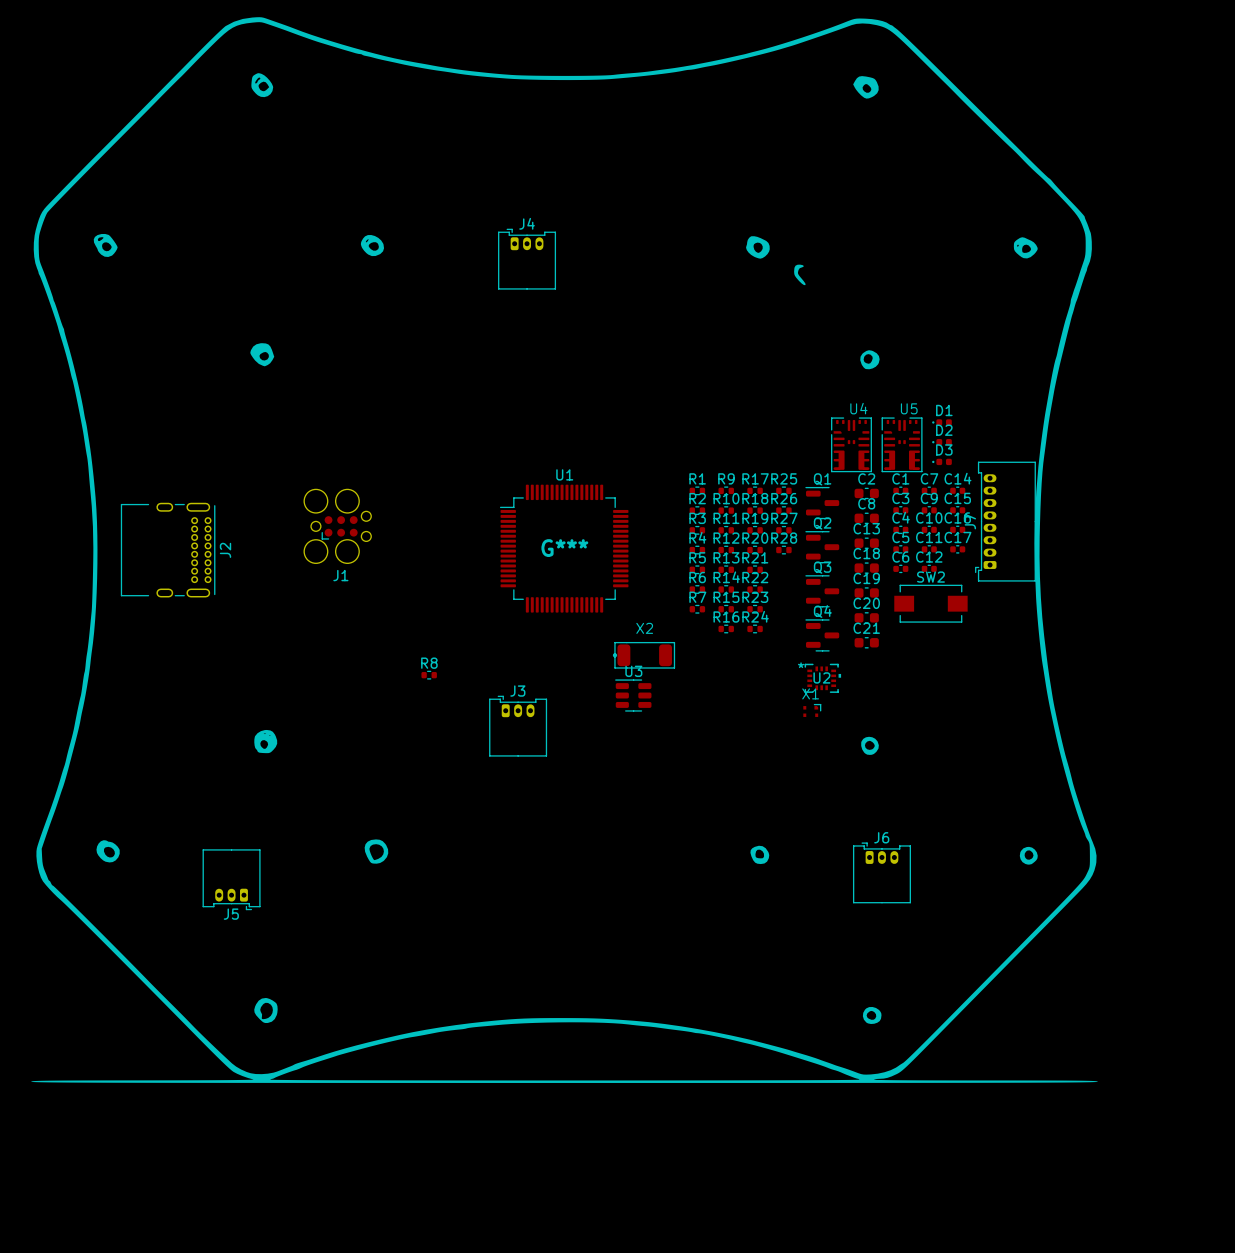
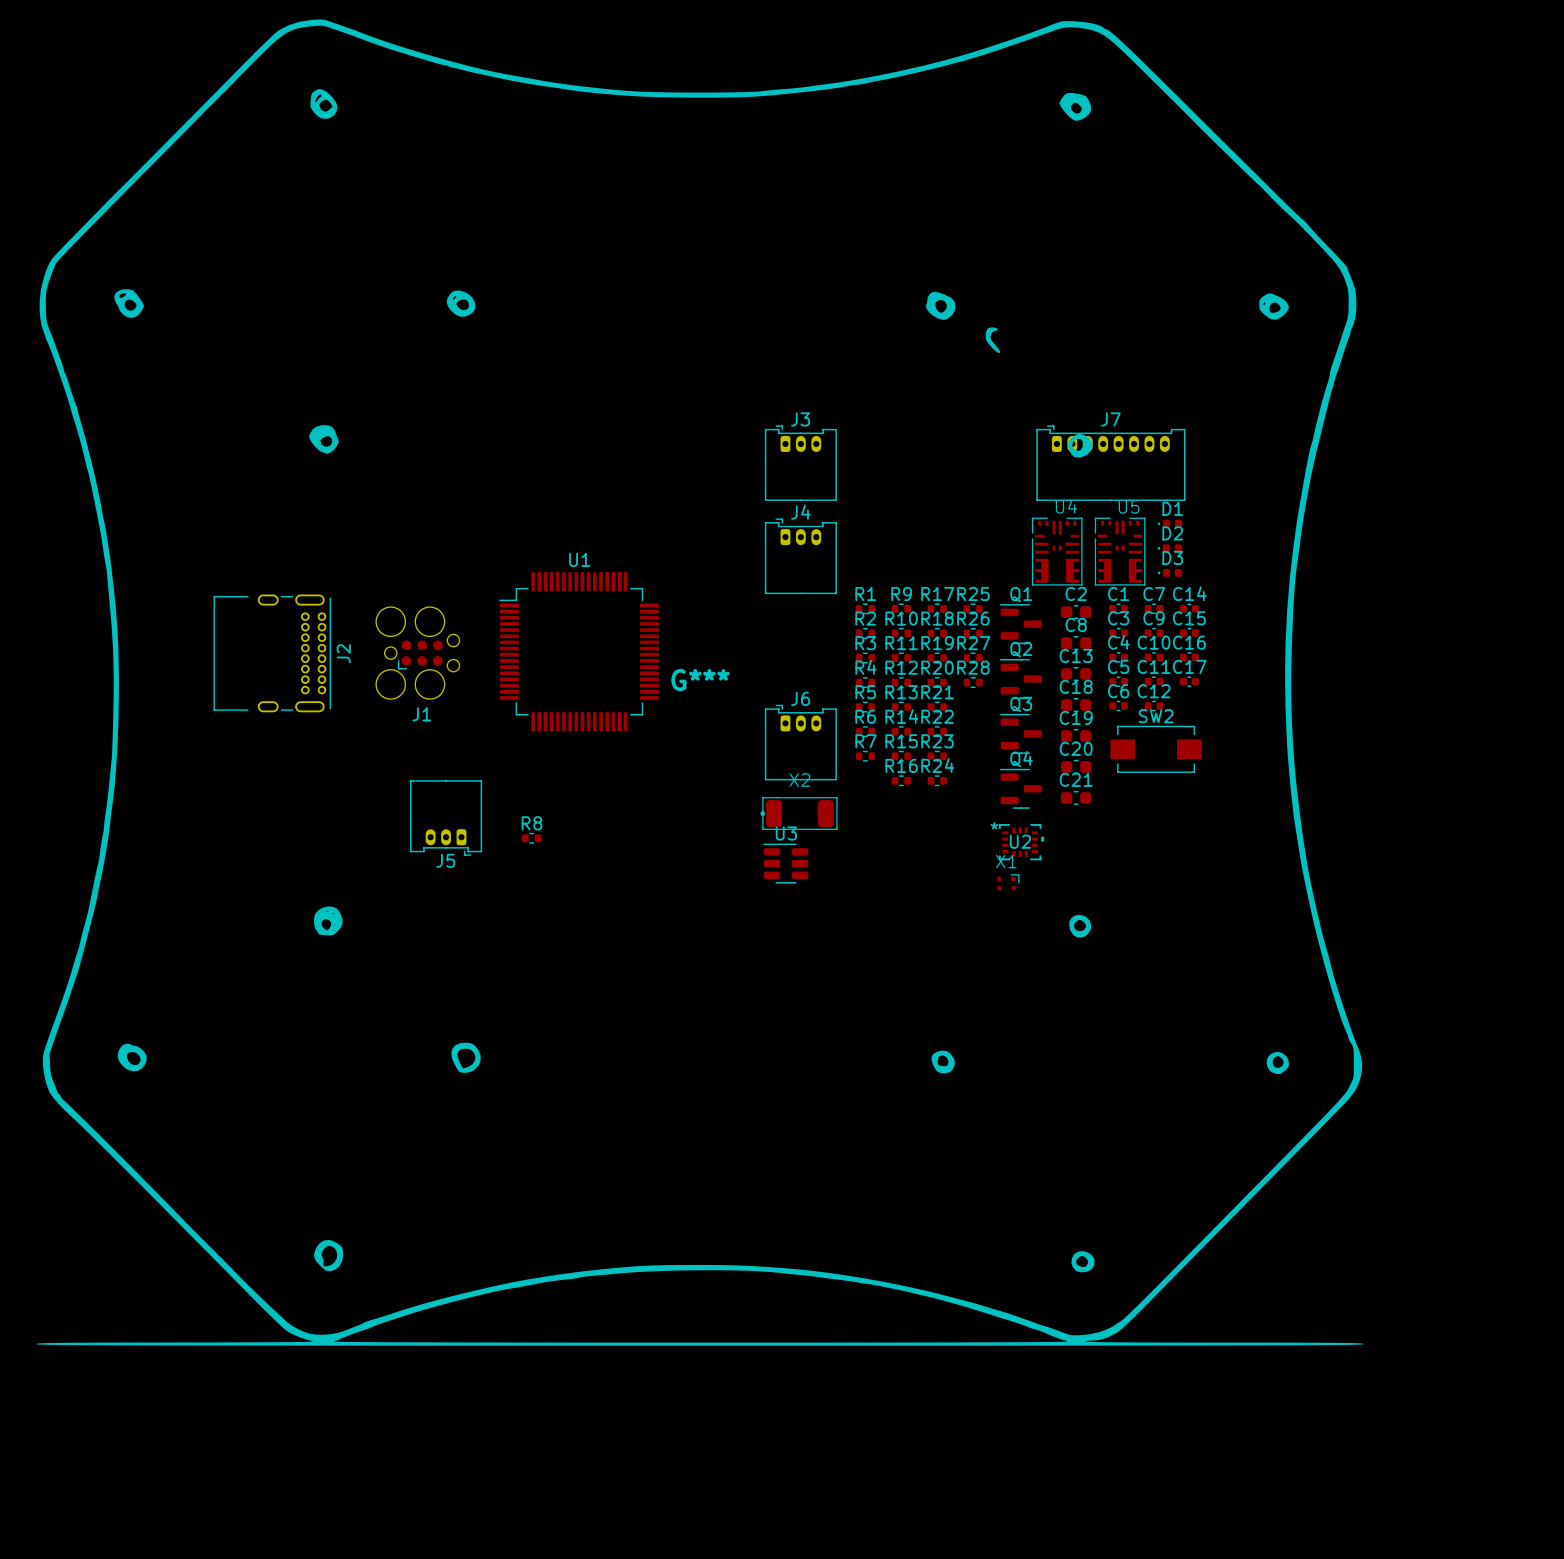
J4 position: (527, 259) -> (800, 556)
J7 rotation: 0° (1005, 521) -> 90° clockwise (1110, 463)
J7 position: (1005, 521) -> (1110, 463)
U1 position: (564, 548) -> (579, 651)
J2 position: (168, 550) -> (272, 653)
J3 position: (518, 726) -> (800, 463)
J6 position: (881, 872) -> (800, 742)
J5 position: (231, 879) -> (446, 818)

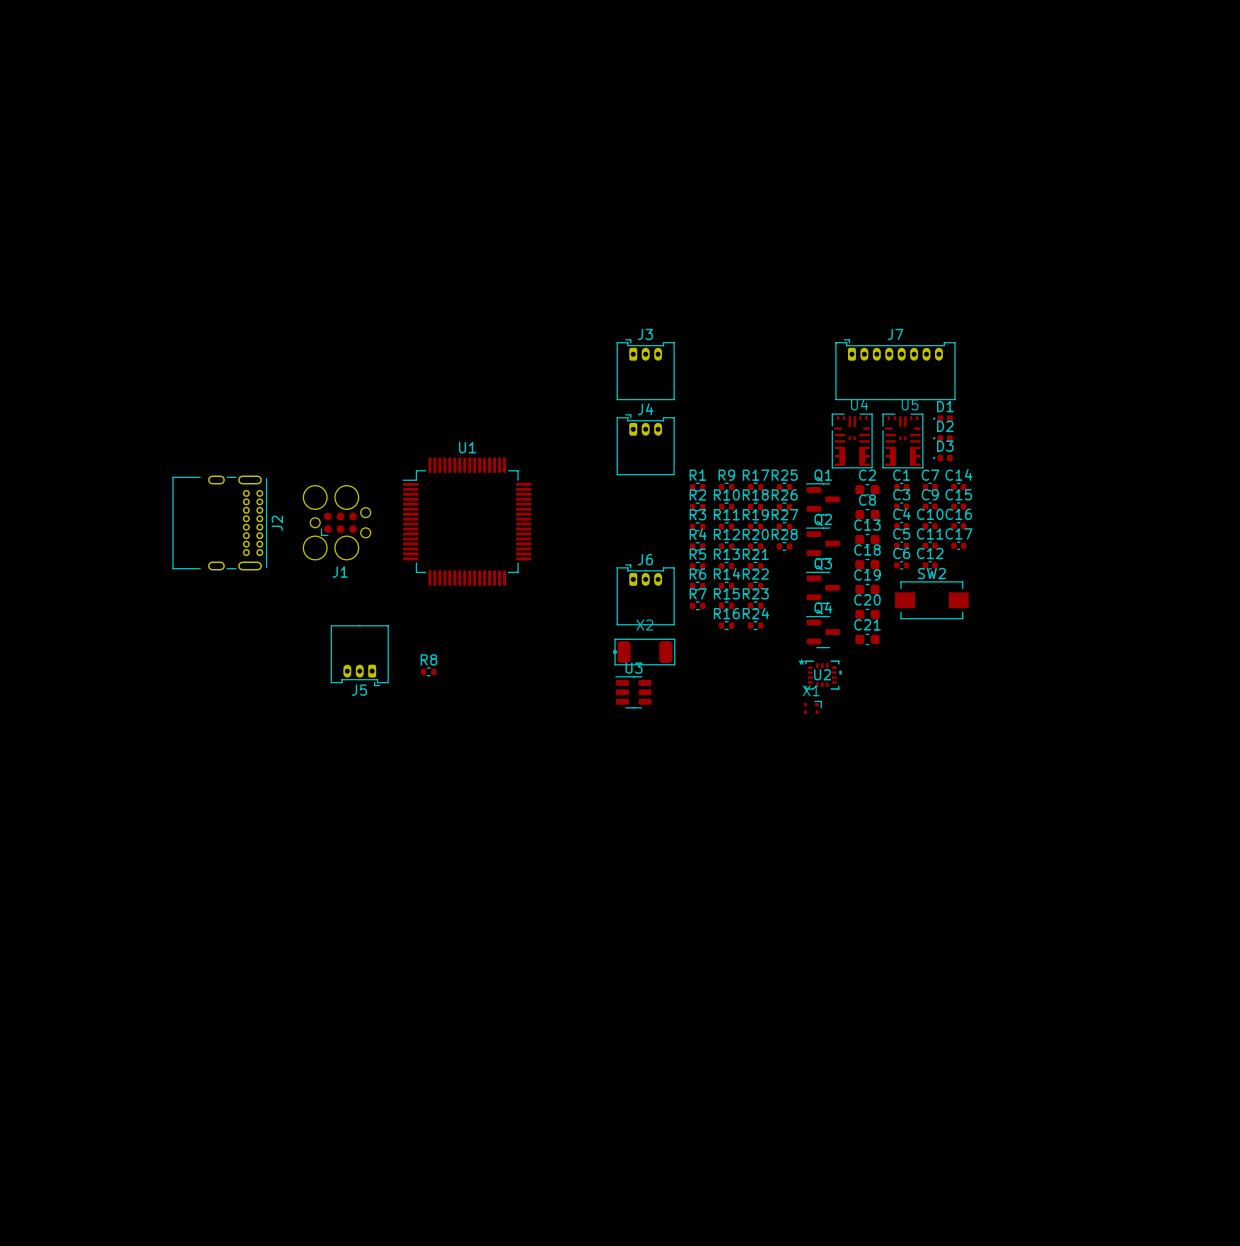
G***: (700, 682) -> none

